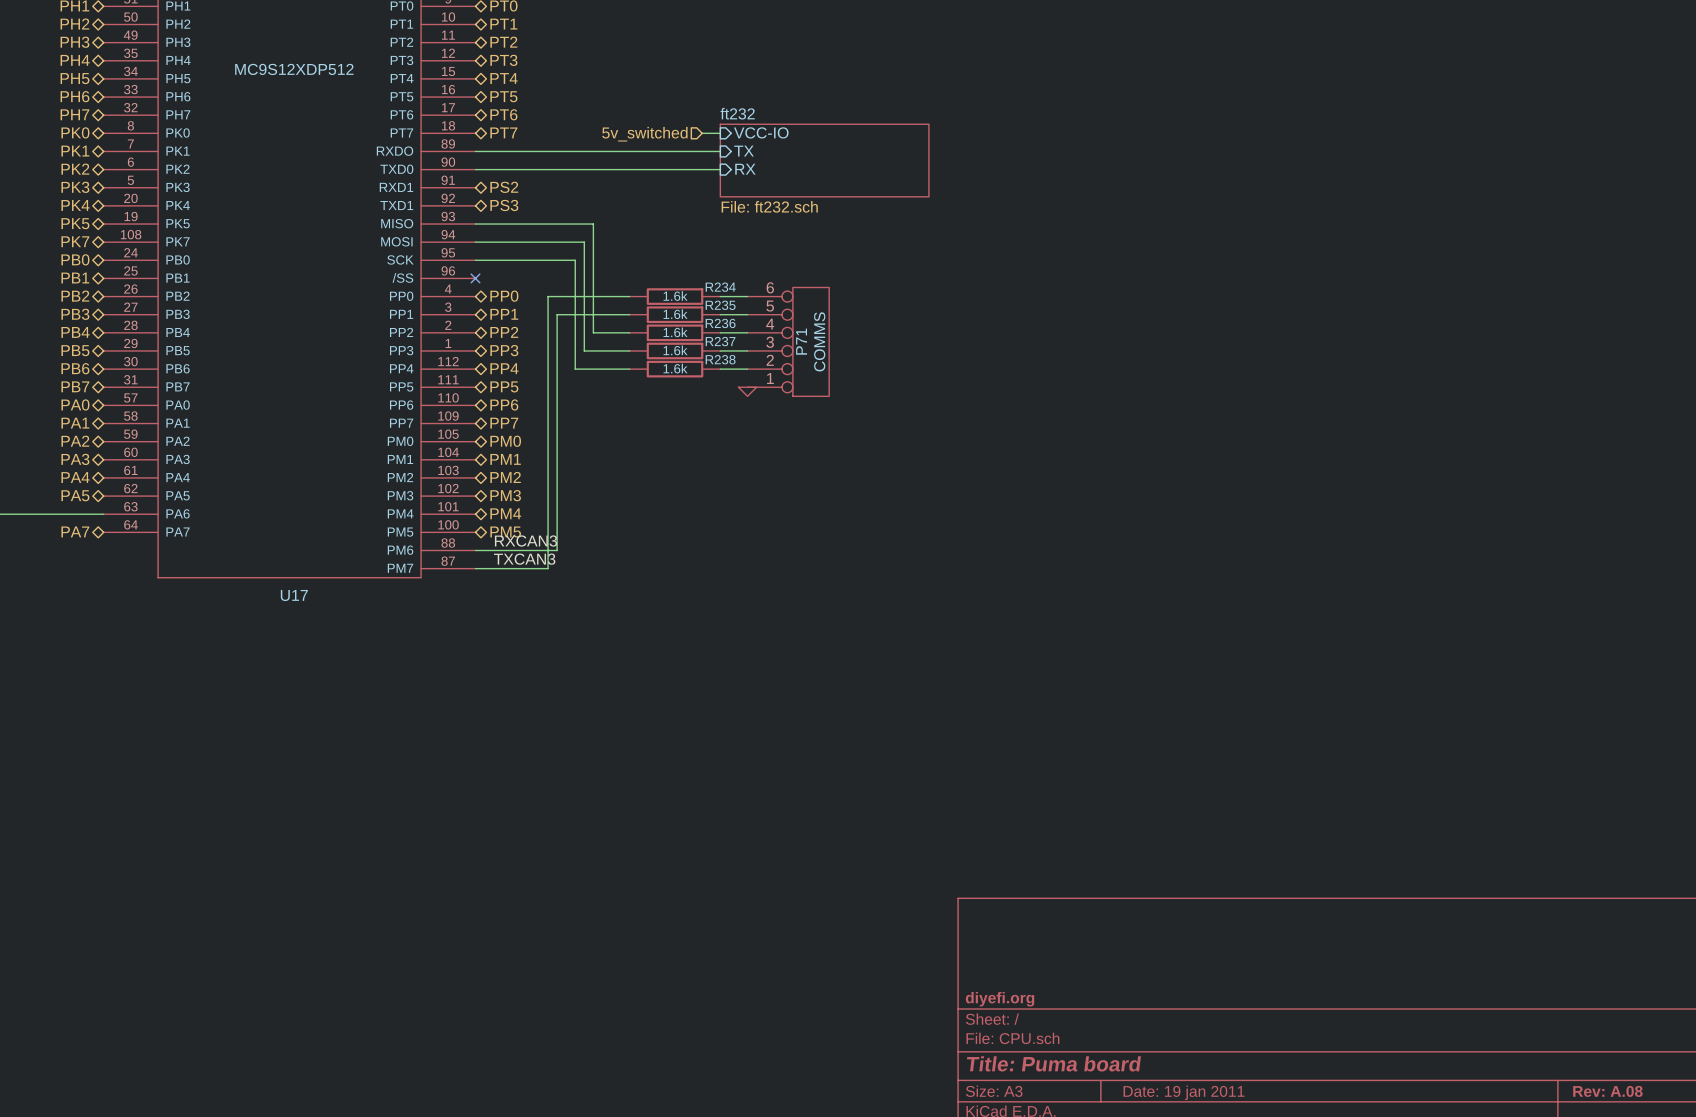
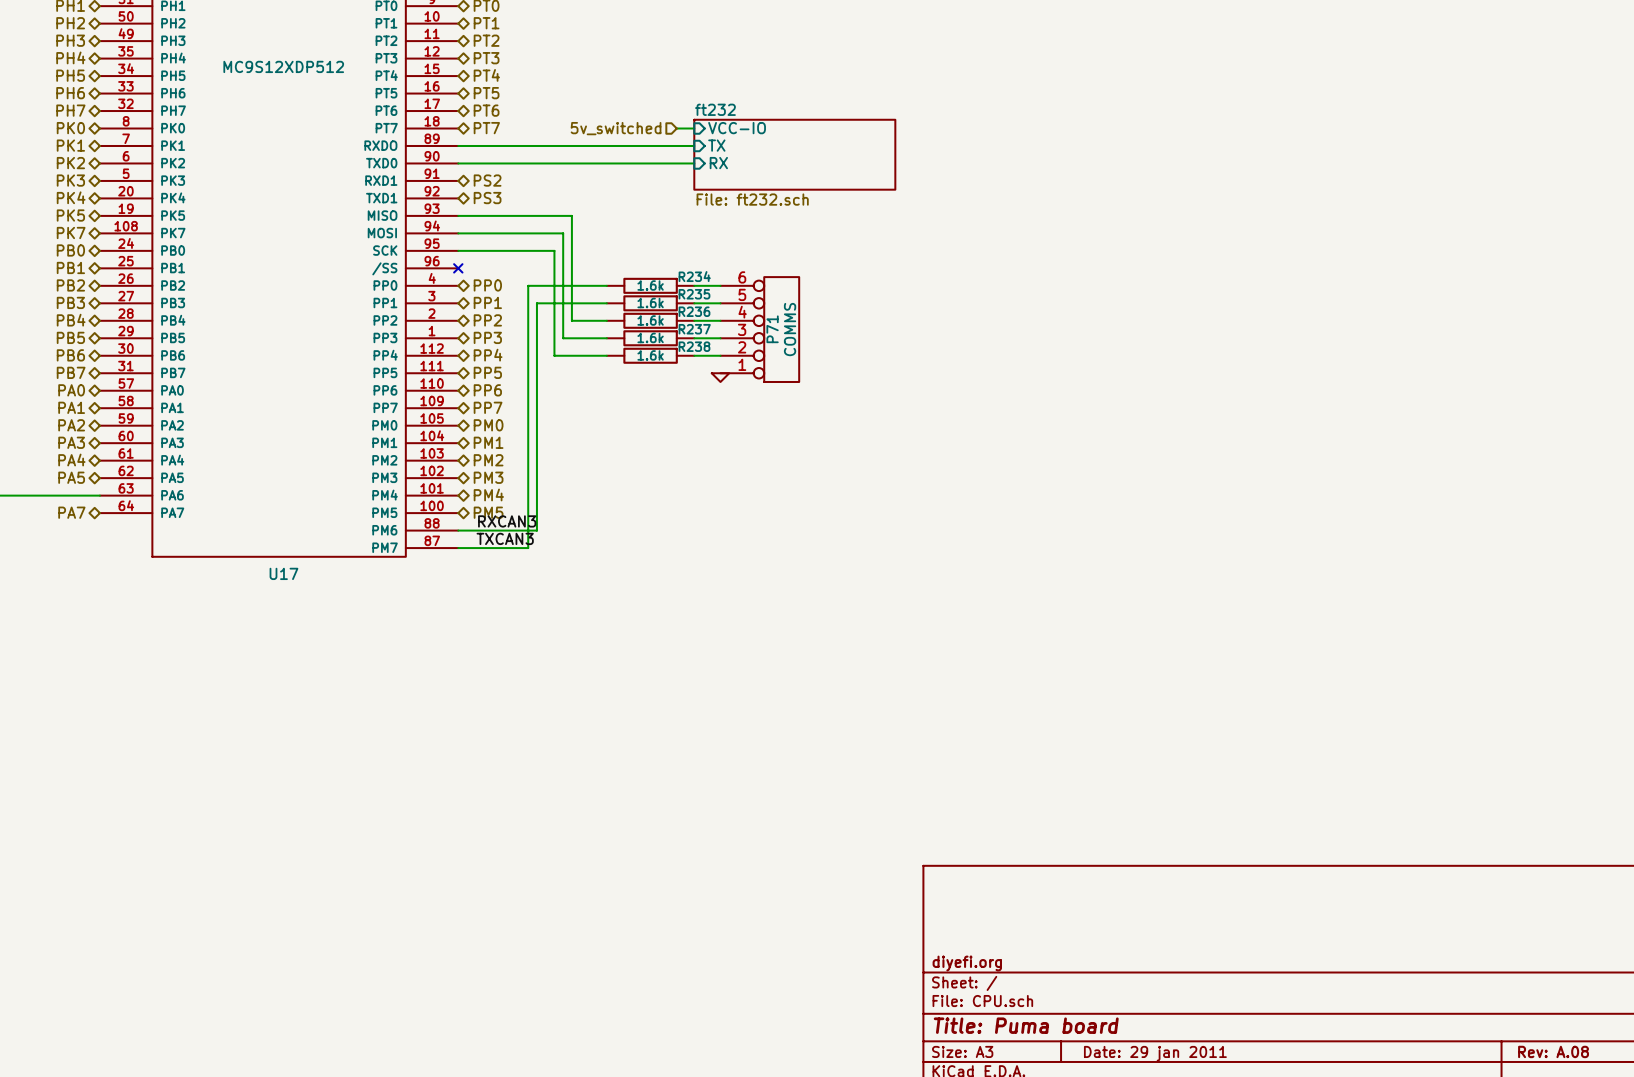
title block: Date: 19 jan 2011 (1184, 1092) -> Date: 29 jan 2011 (1155, 1053)

